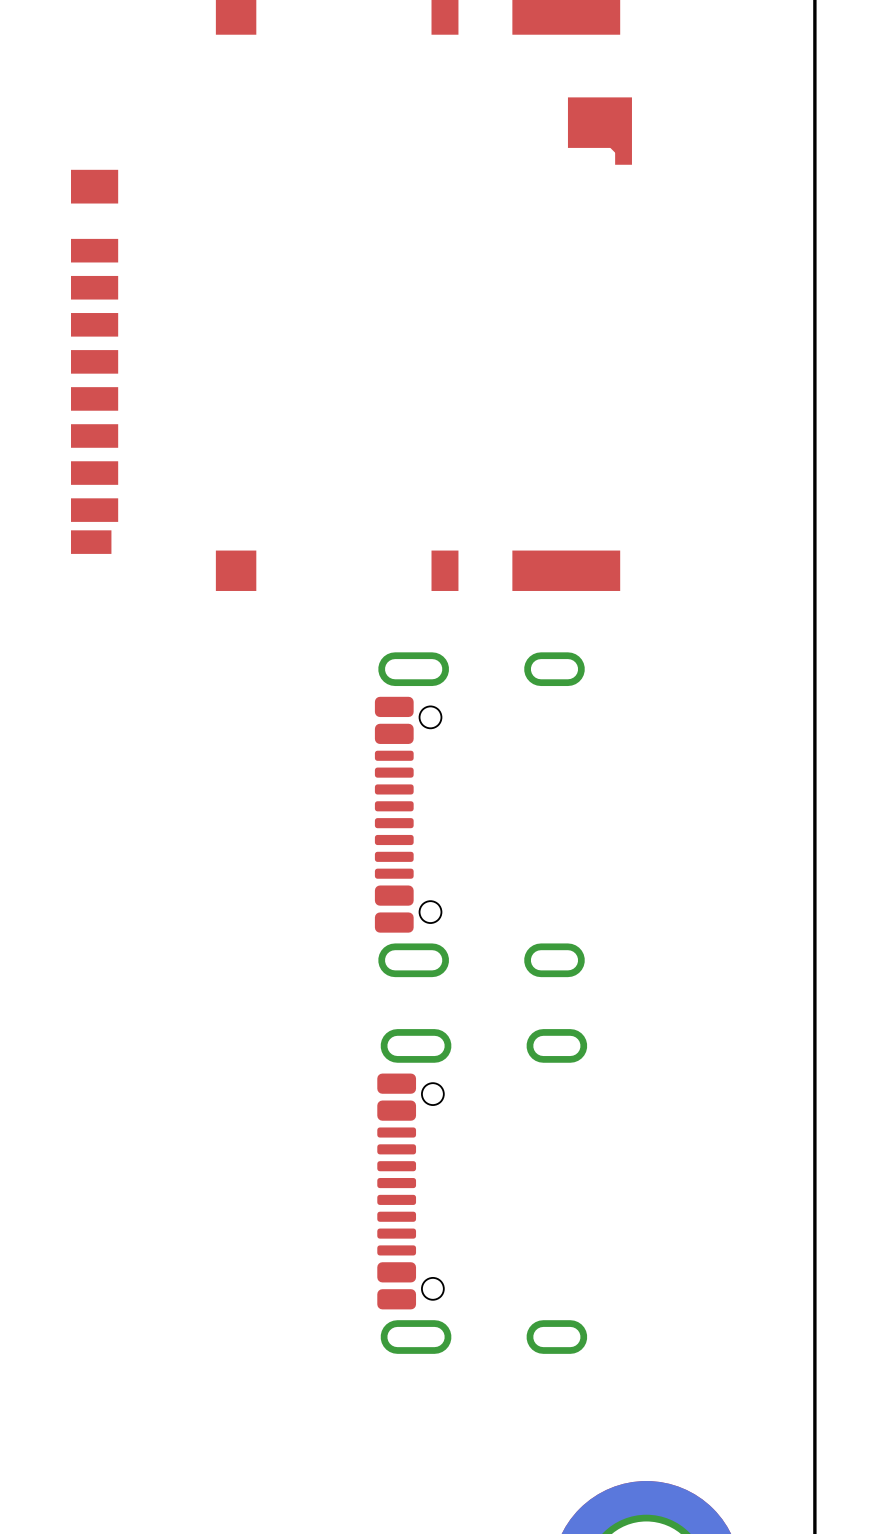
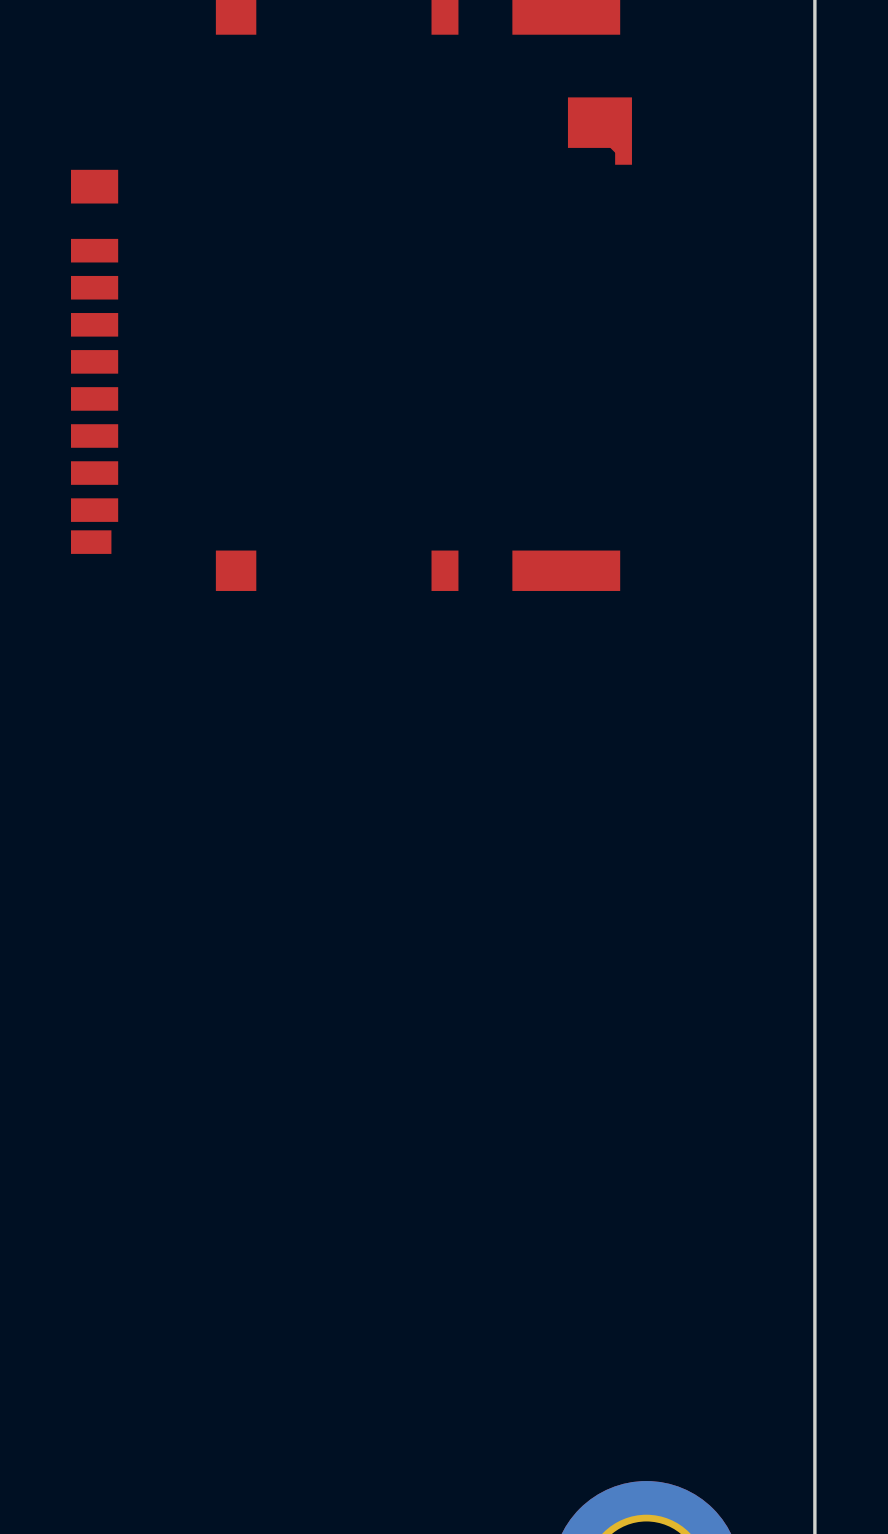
part: (479, 814) -> none
part: (482, 1191) -> none

